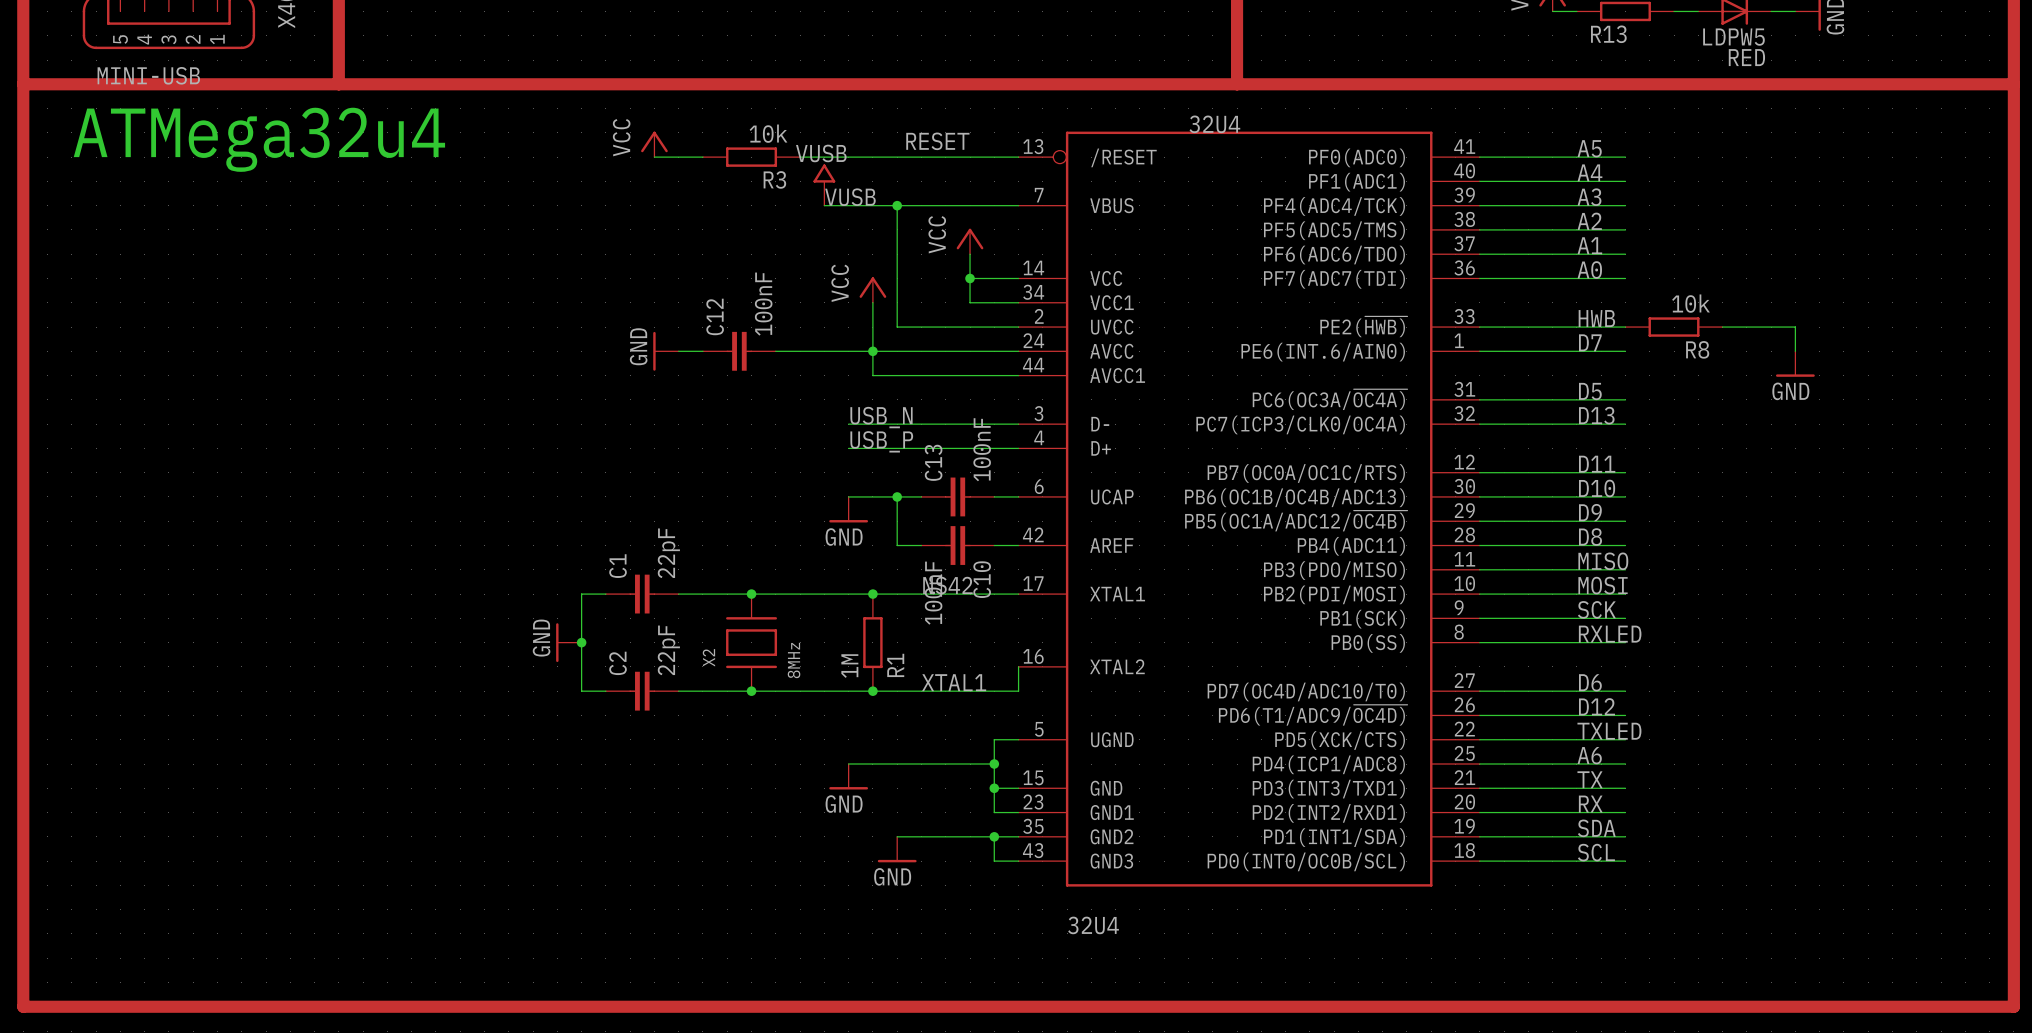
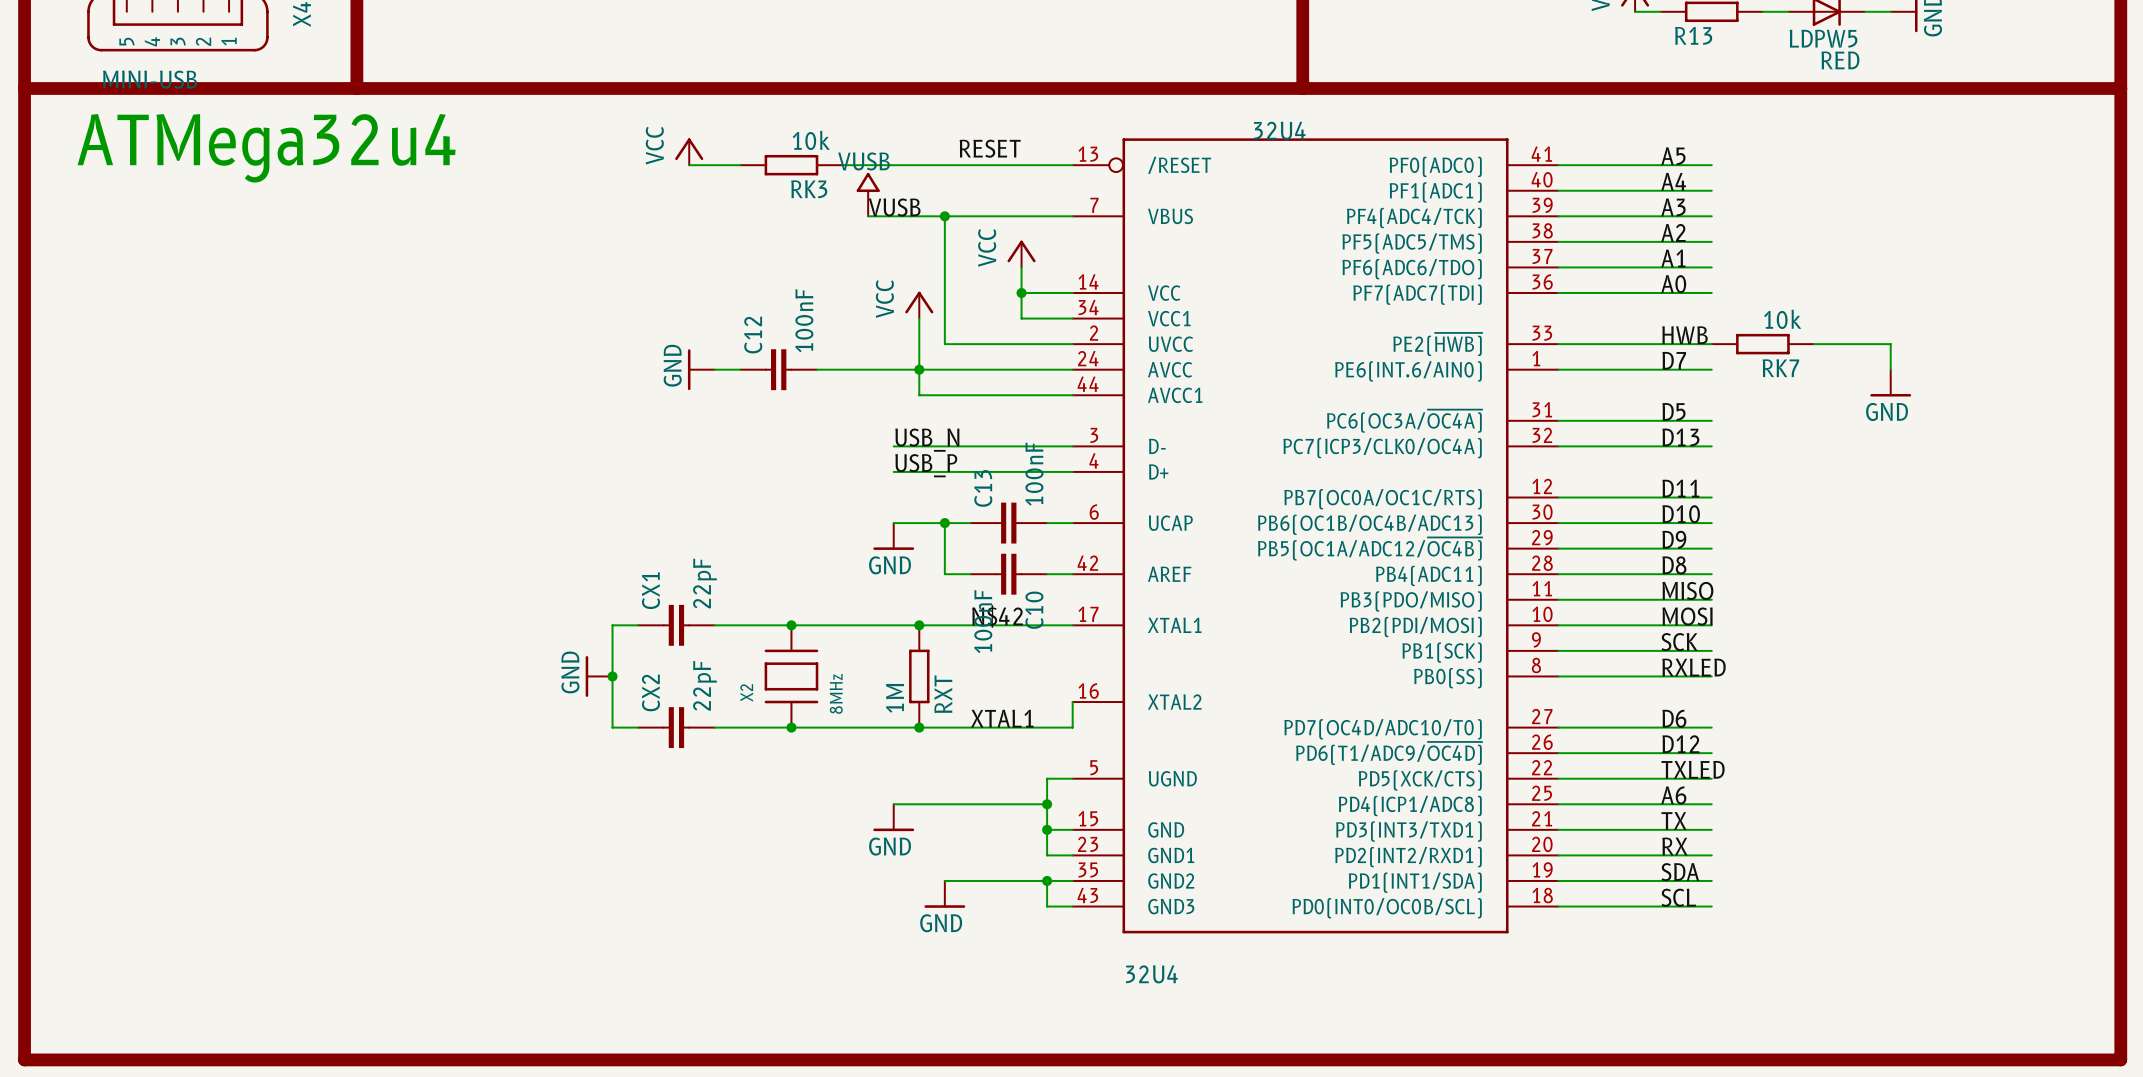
R3 name: R3 (774, 179) -> RK3 (809, 189)
R8 name: R8 (1697, 349) -> RK7 (1780, 368)
C1 name: C1 (618, 566) -> CX1 (650, 590)
C2 name: C2 (618, 663) -> CX2 (650, 692)
R1 name: R1 (895, 665) -> RXT (943, 694)

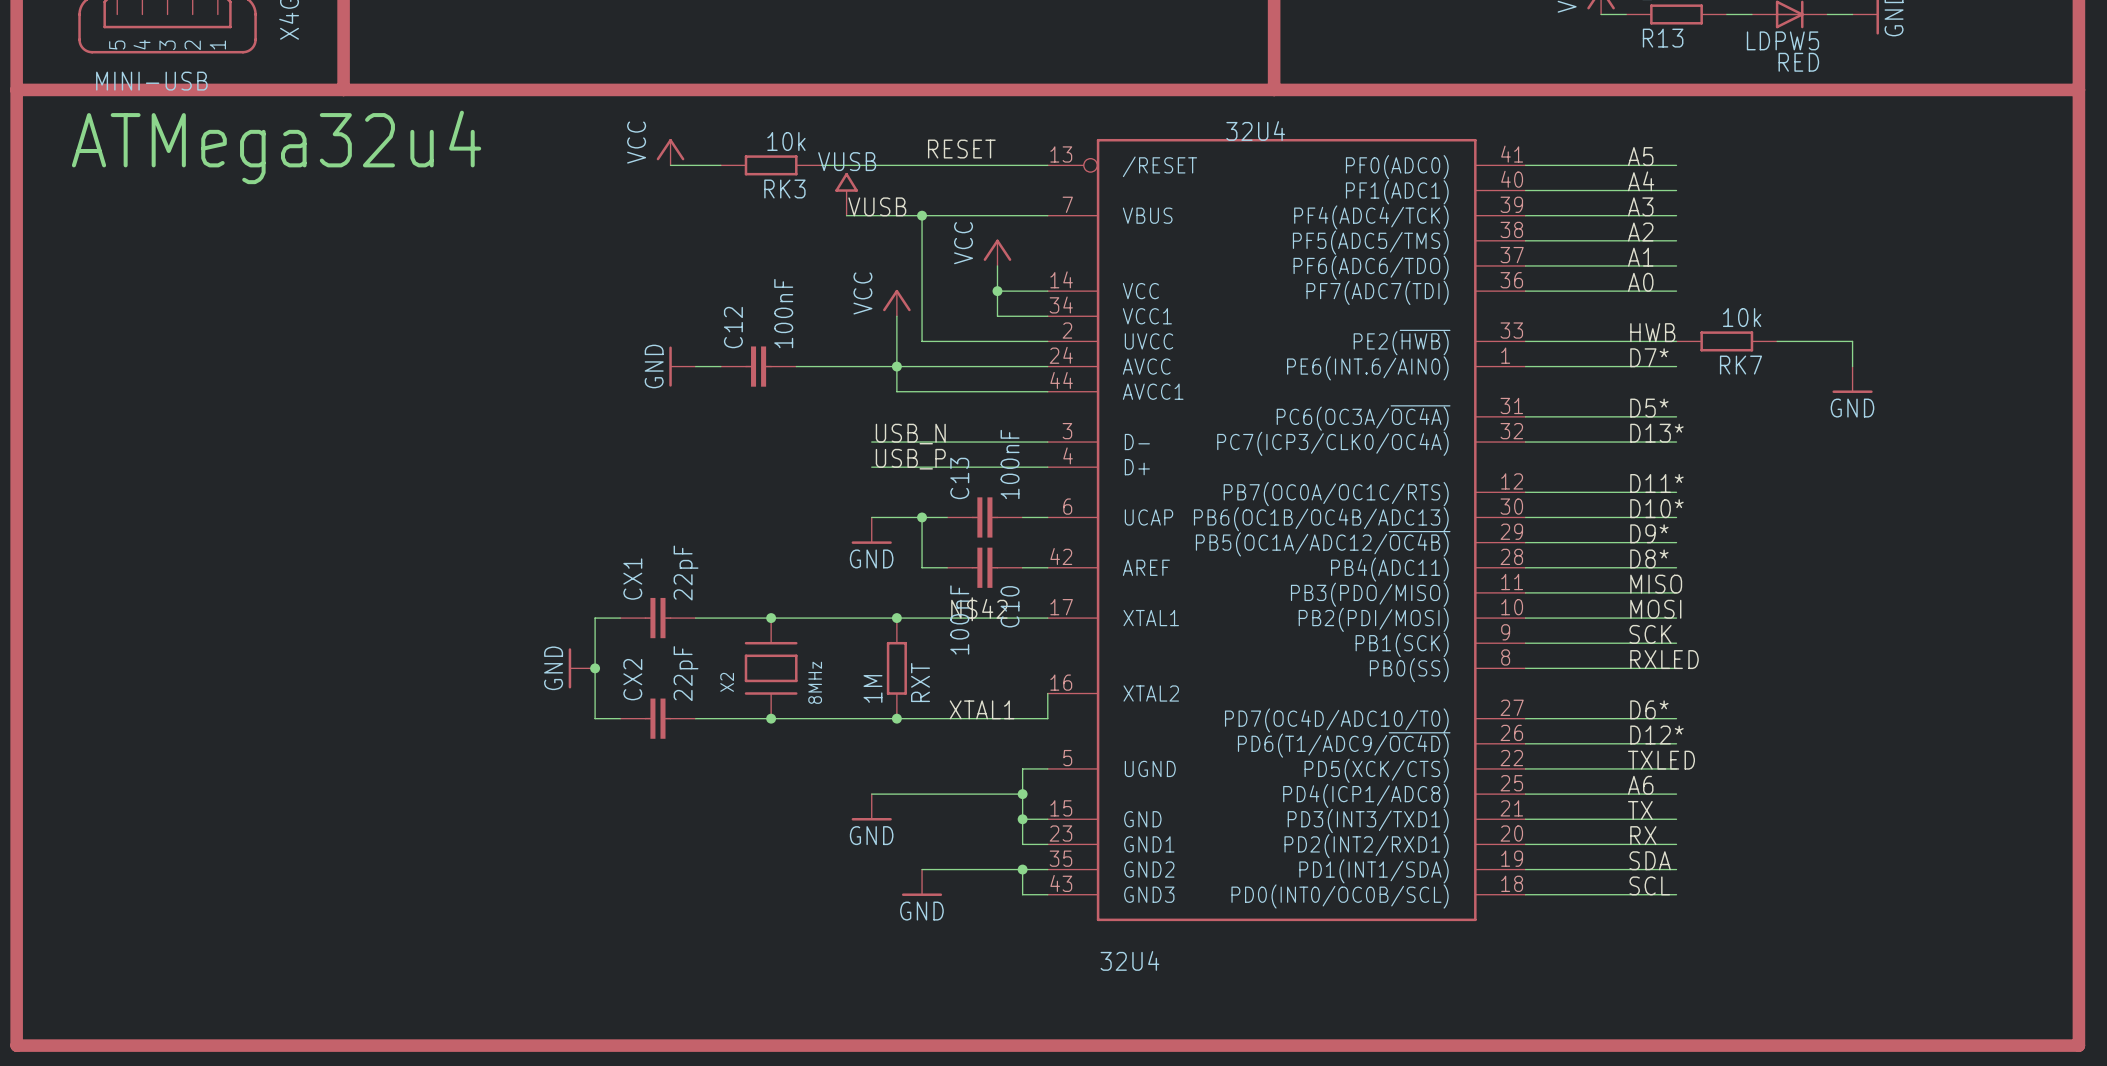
label: D7 (1674, 360) -> D7* (1649, 357)
label: D5 (1673, 411) -> D5* (1649, 408)
label: D13 (1680, 437) -> D13* (1656, 433)
label: D11 (1680, 488) -> D11* (1656, 483)
label: D10 (1681, 514) -> D10* (1656, 508)
label: D9 (1674, 539) -> D9* (1649, 533)
label: D8 (1674, 565) -> D8* (1649, 558)
label: D6 (1674, 718) -> D6* (1649, 709)
label: D12 (1680, 744) -> D12* (1656, 735)

